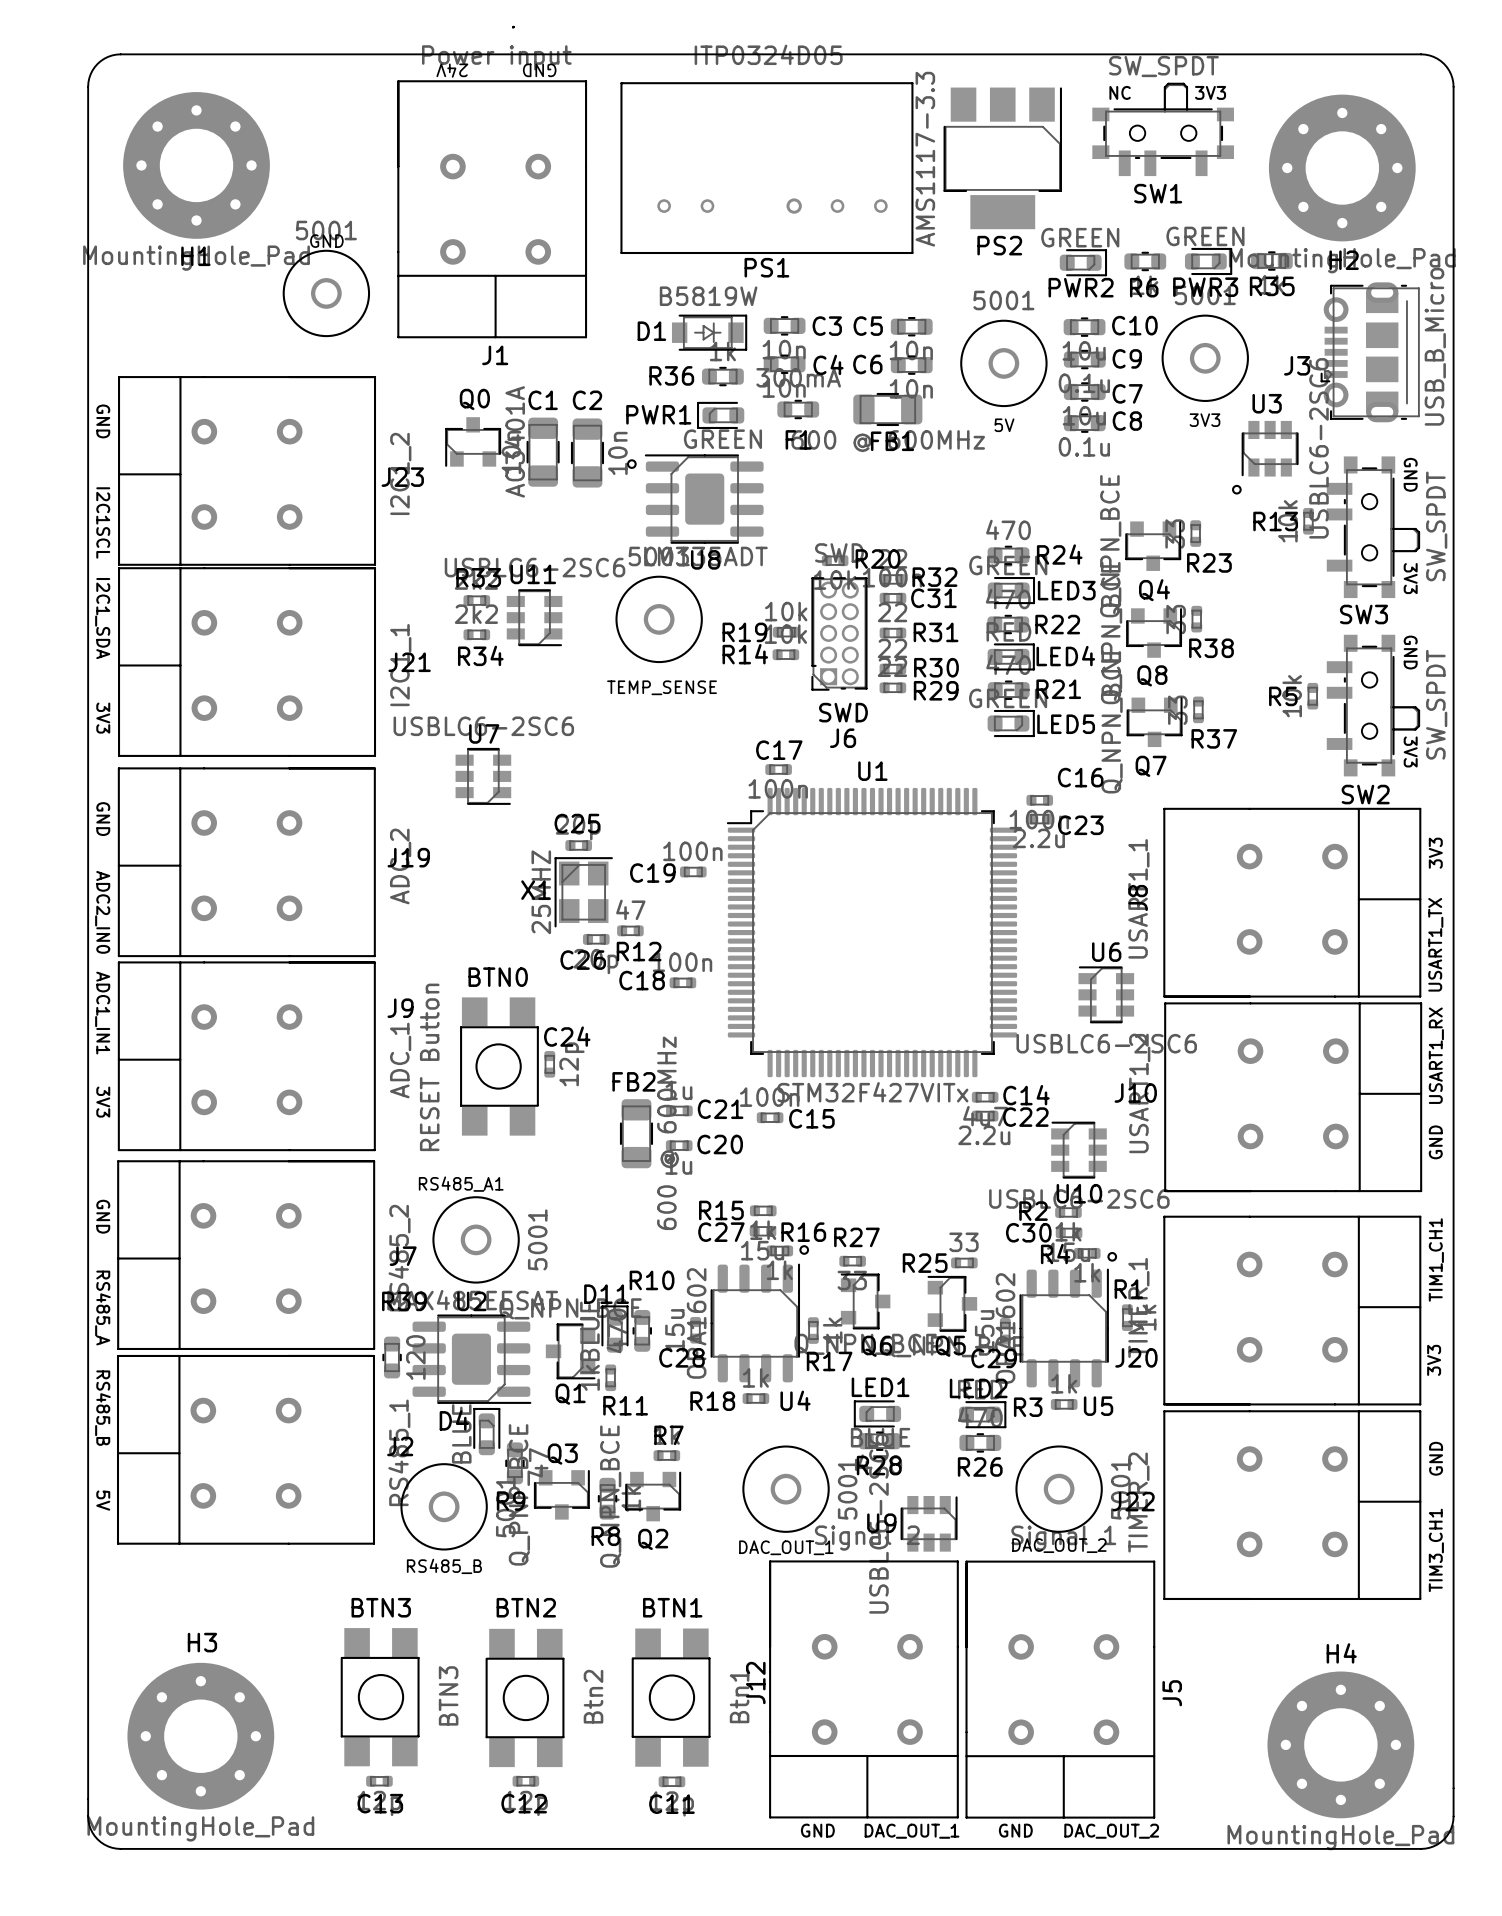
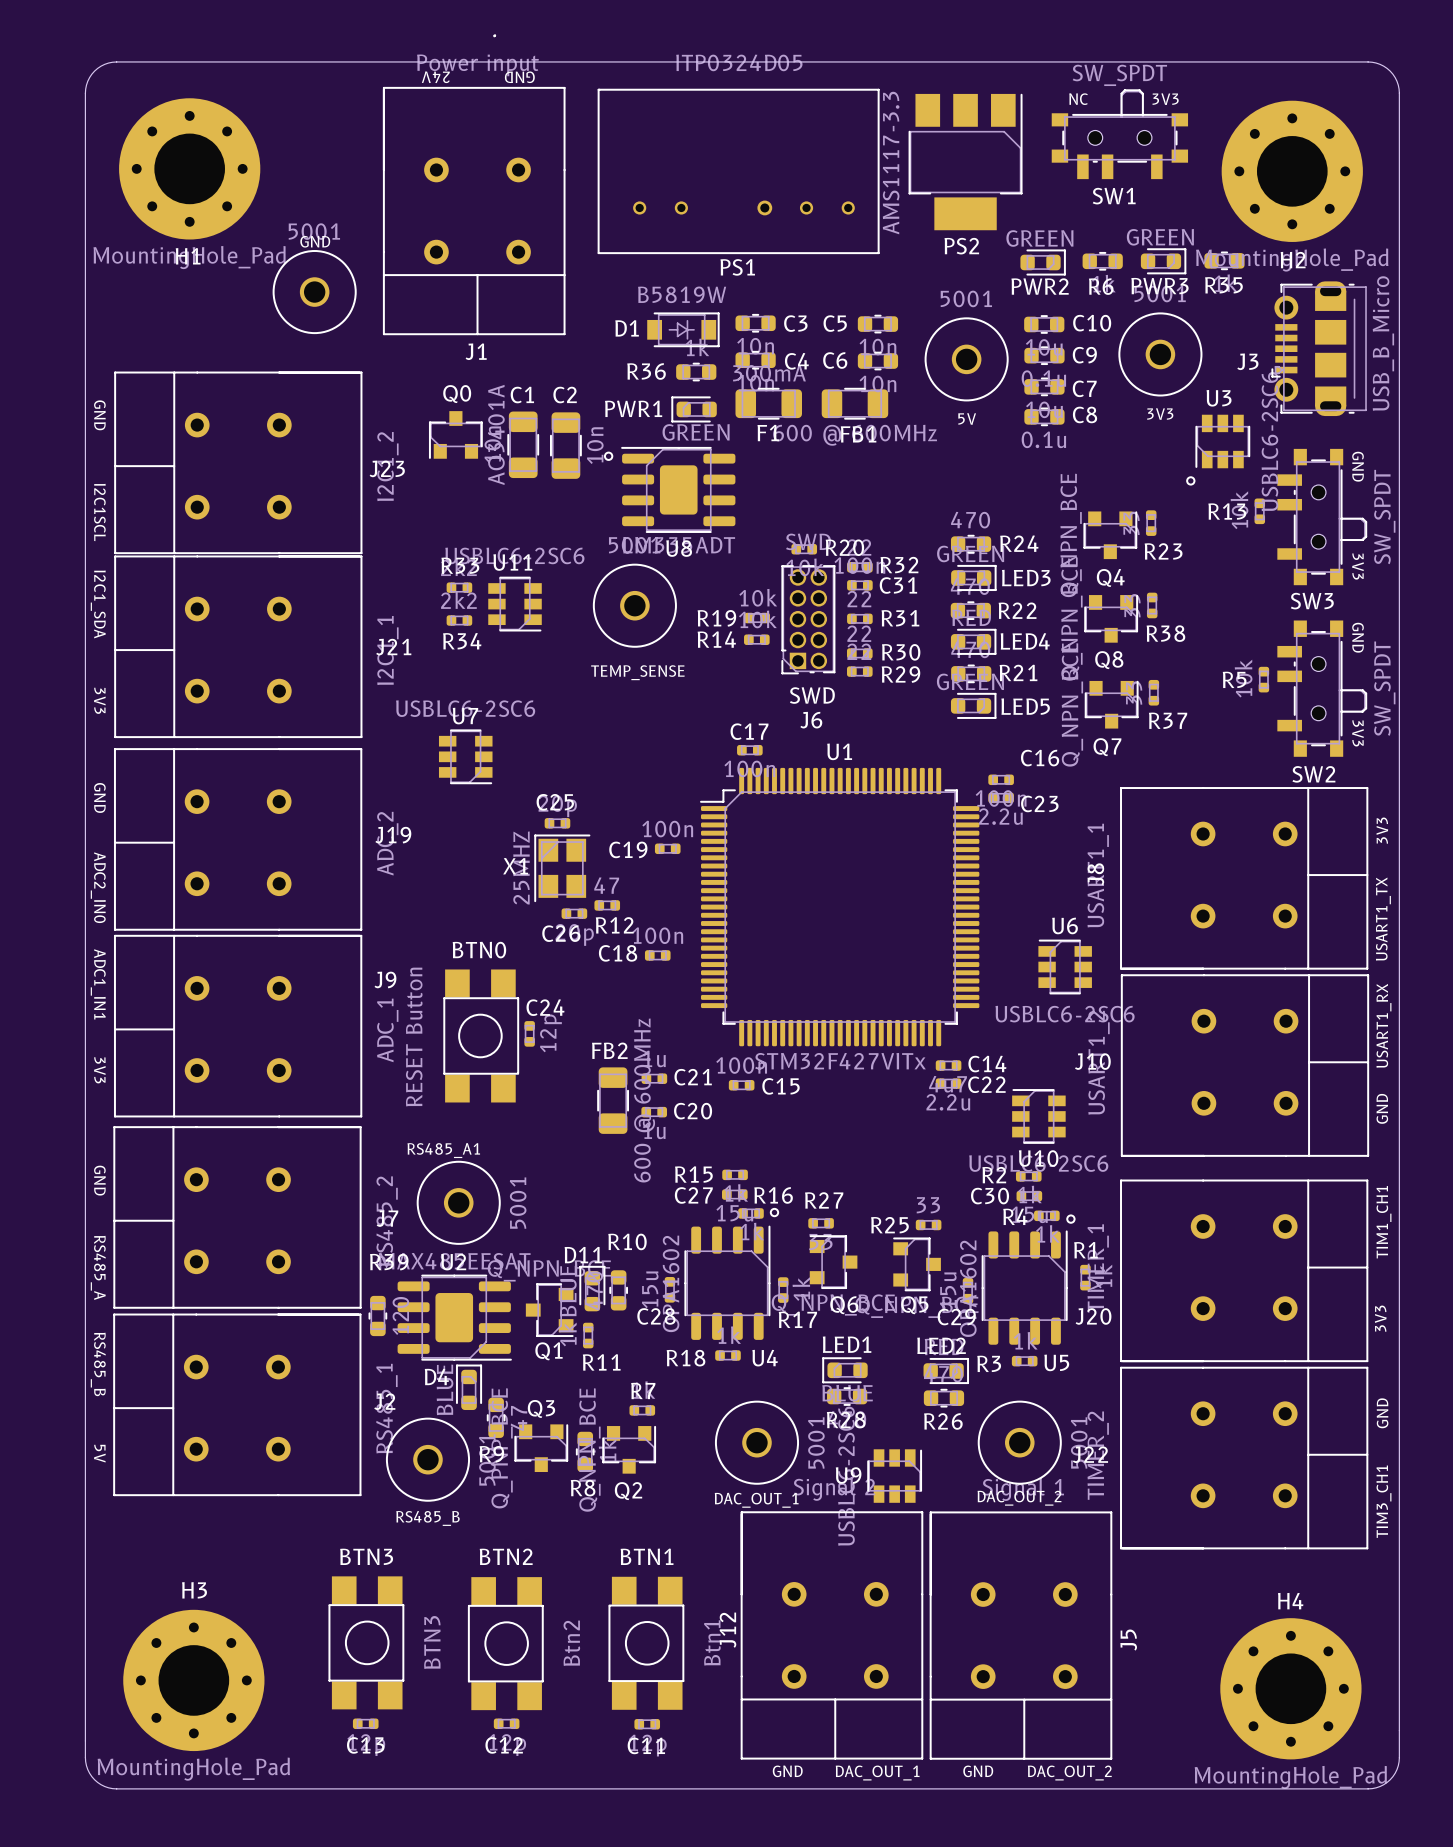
F1 footprint: [777, 399, 820, 420] -> [735, 387, 803, 420]

